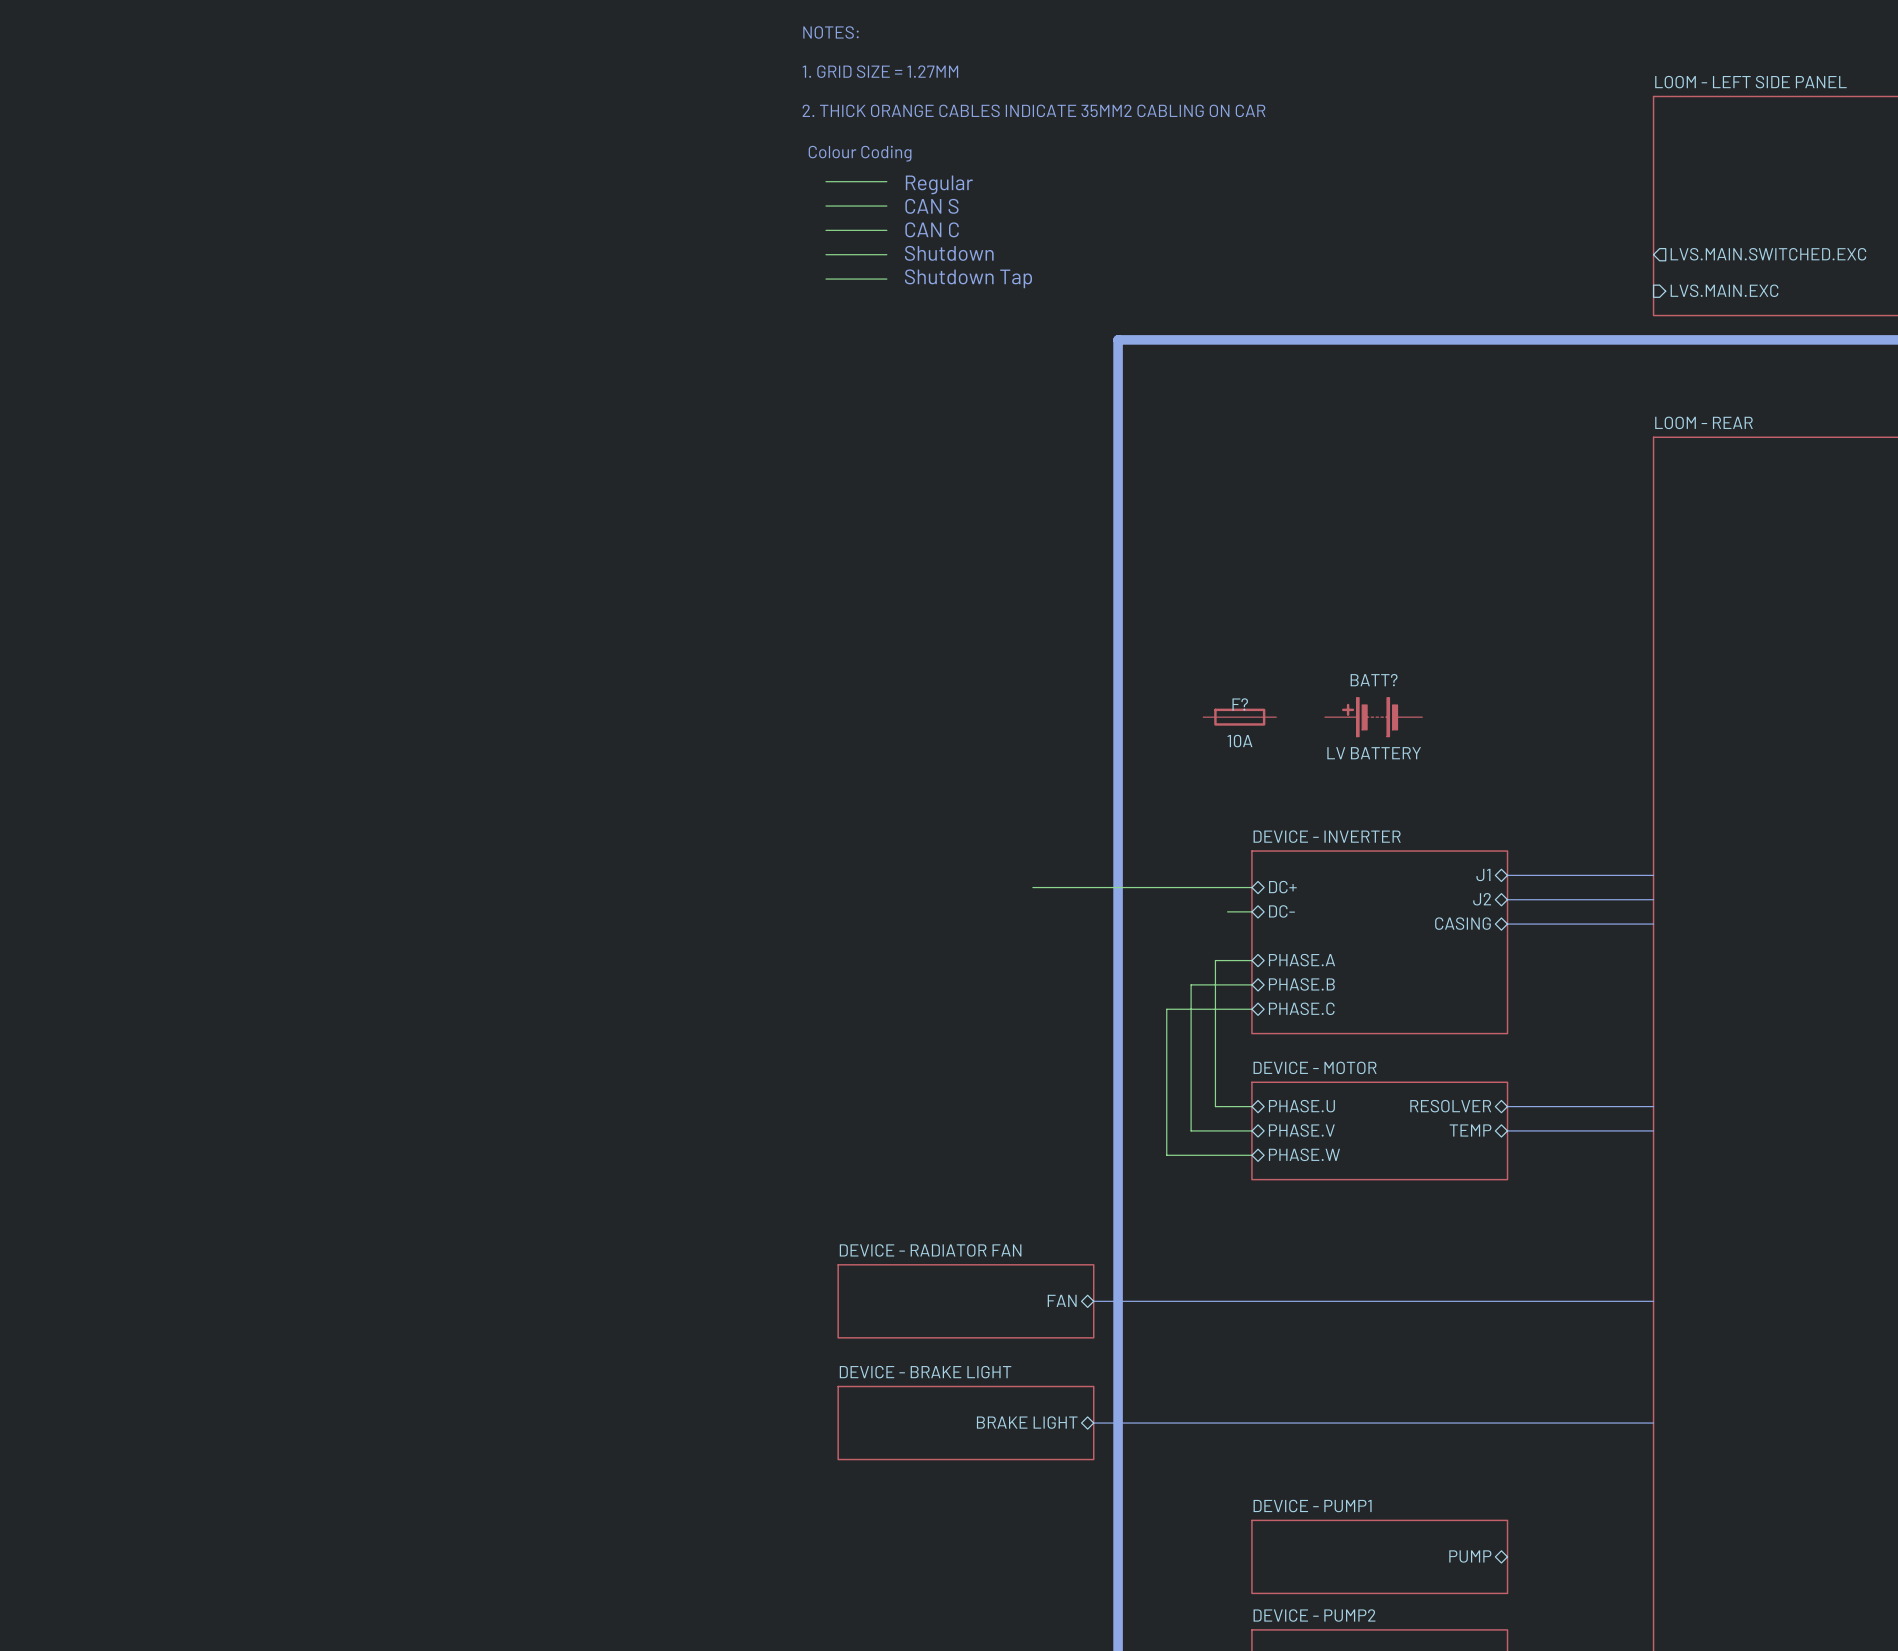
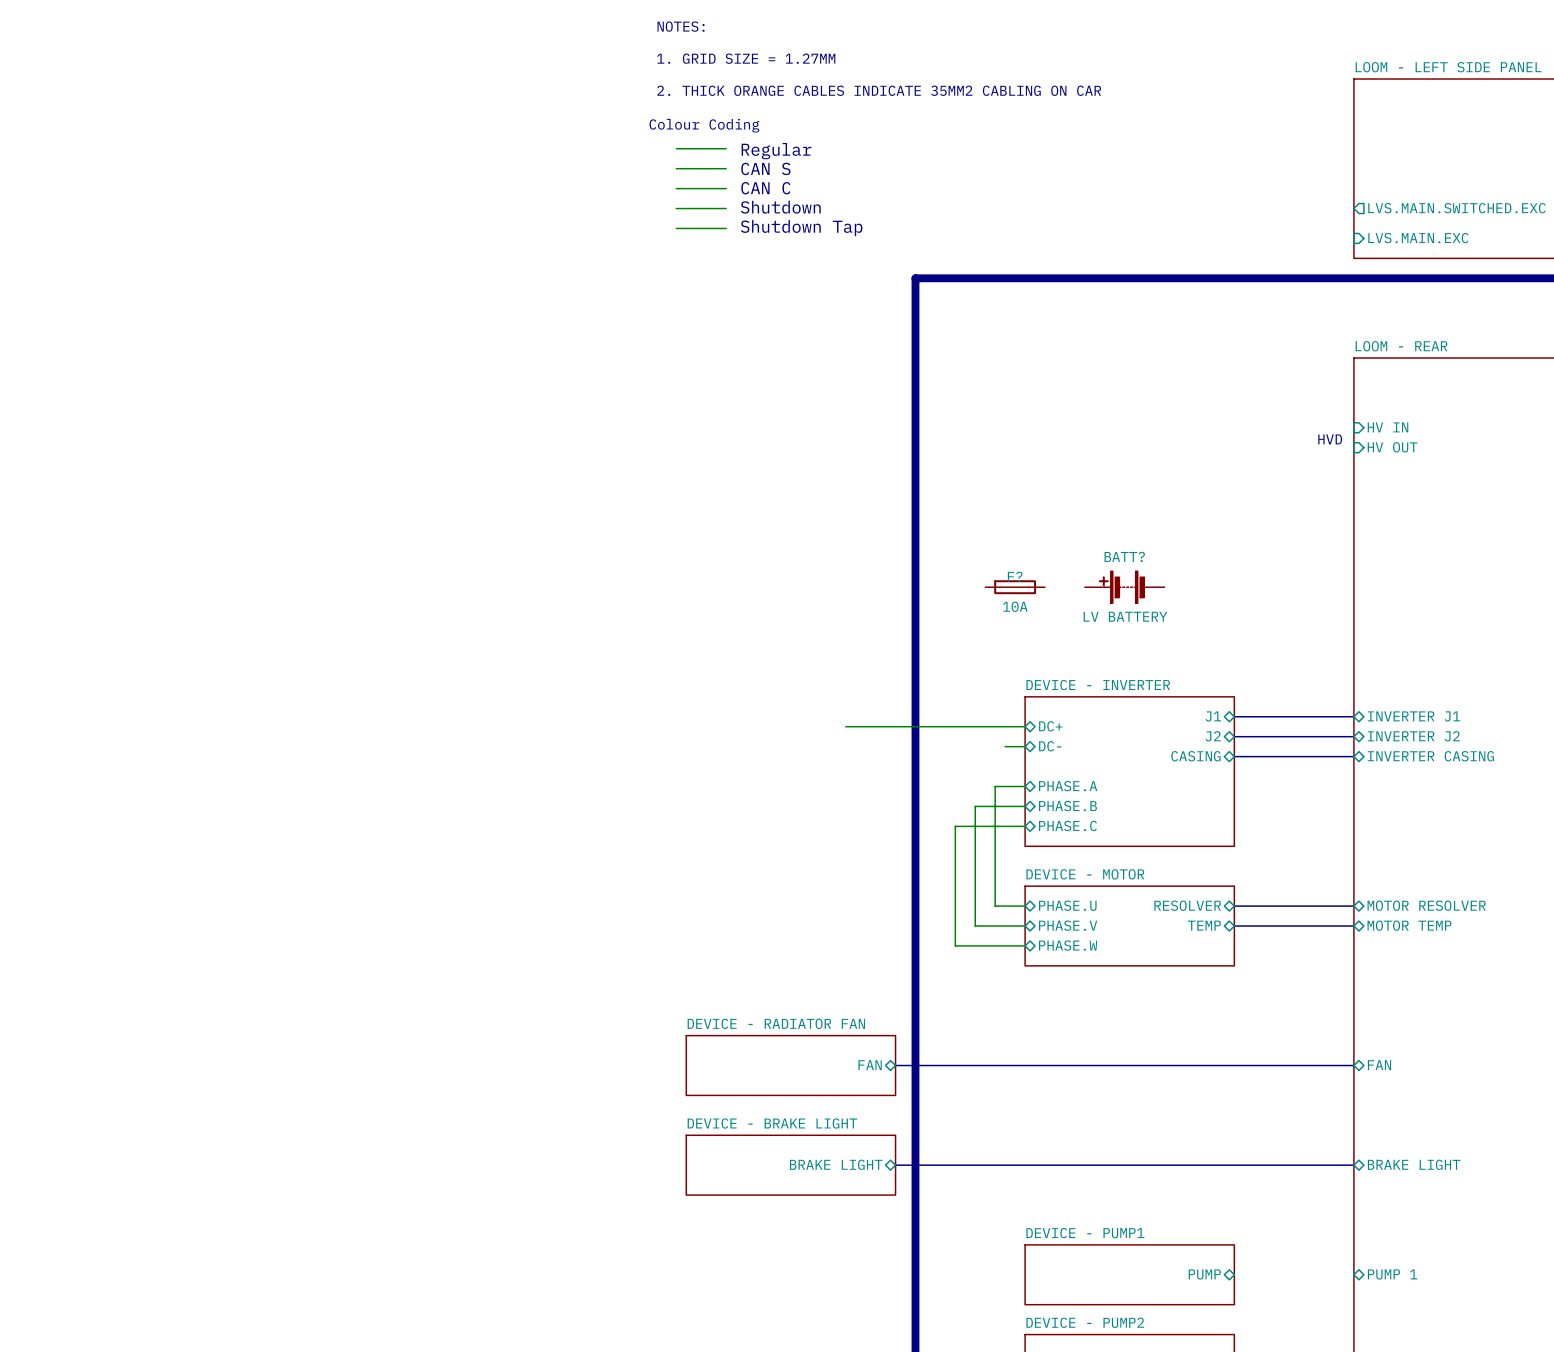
sheet pin: none -> HV IN (1388, 427)
text: none -> HVD (1330, 439)
sheet pin: none -> HV OUT (1392, 447)
sheet pin: none -> INVERTER J1 (1413, 716)
sheet pin: none -> INVERTER J2 (1413, 736)
sheet pin: none -> INVERTER CASING (1430, 756)
sheet pin: none -> MOTOR RESOLVER (1426, 905)
sheet pin: none -> MOTOR TEMP (1409, 925)
sheet pin: none -> FAN (1379, 1065)
sheet pin: none -> BRAKE LIGHT (1414, 1164)
sheet pin: none -> PUMP 1 (1392, 1274)

